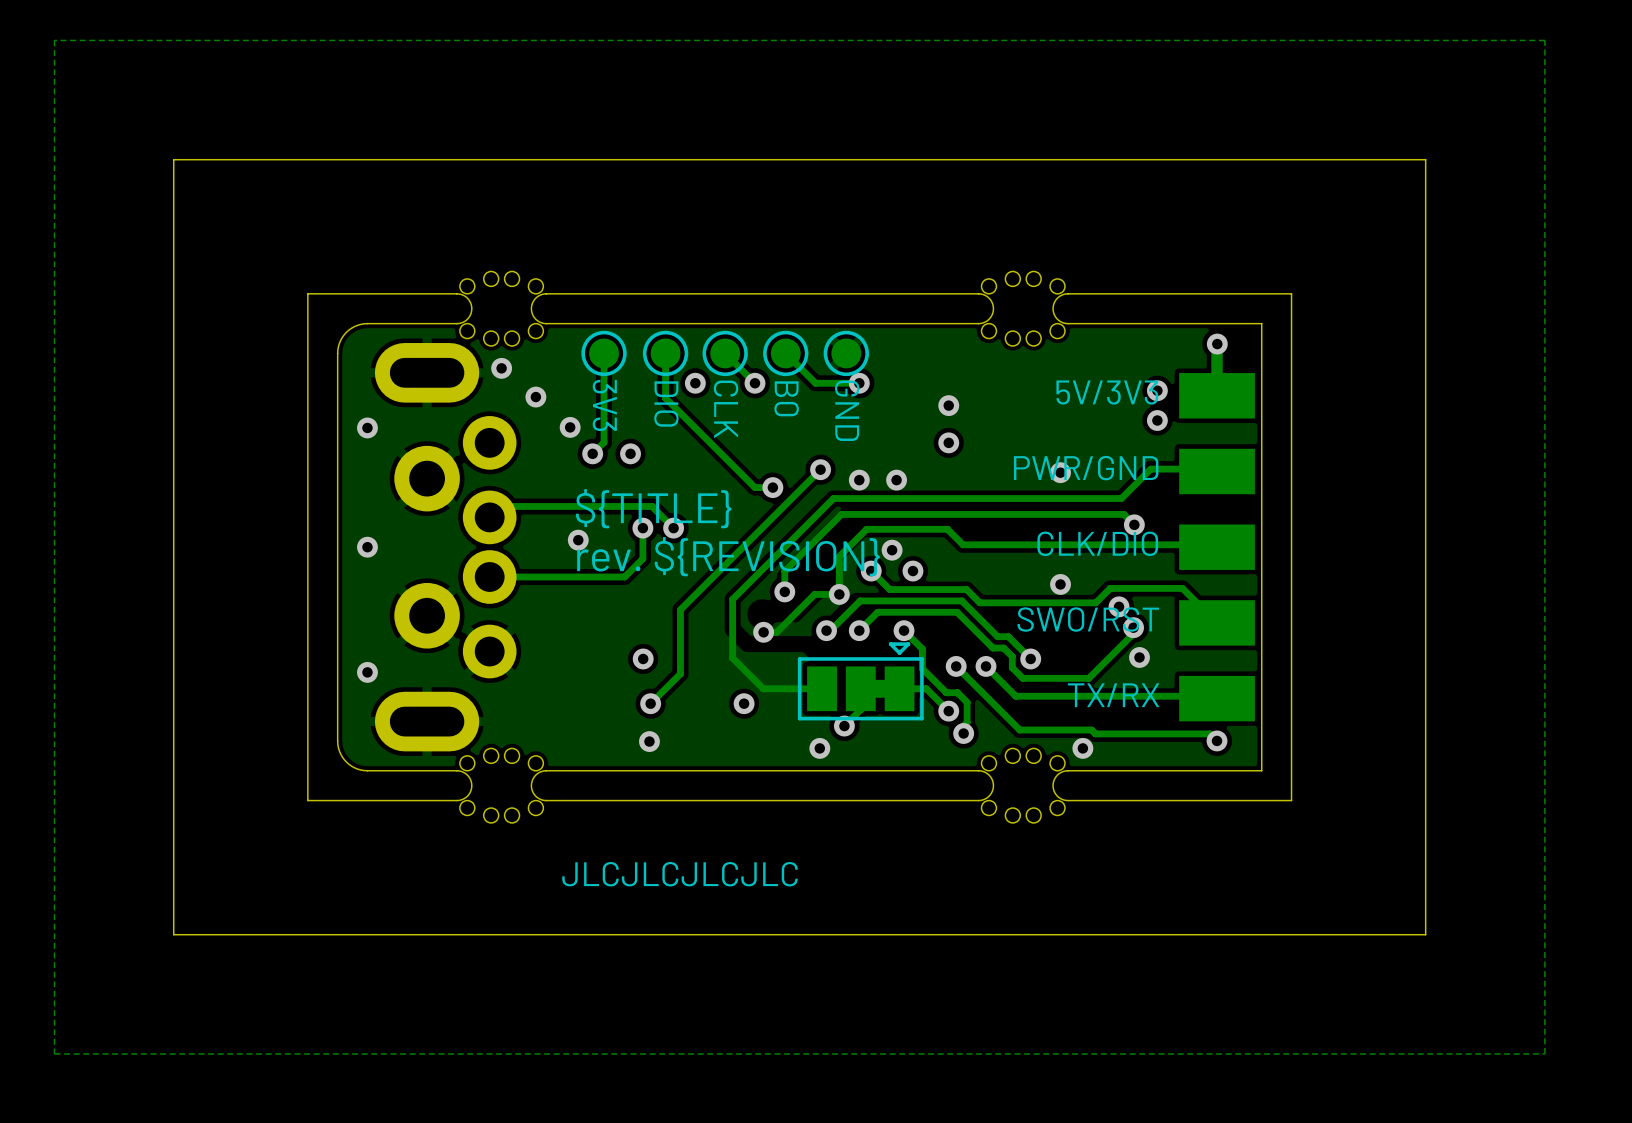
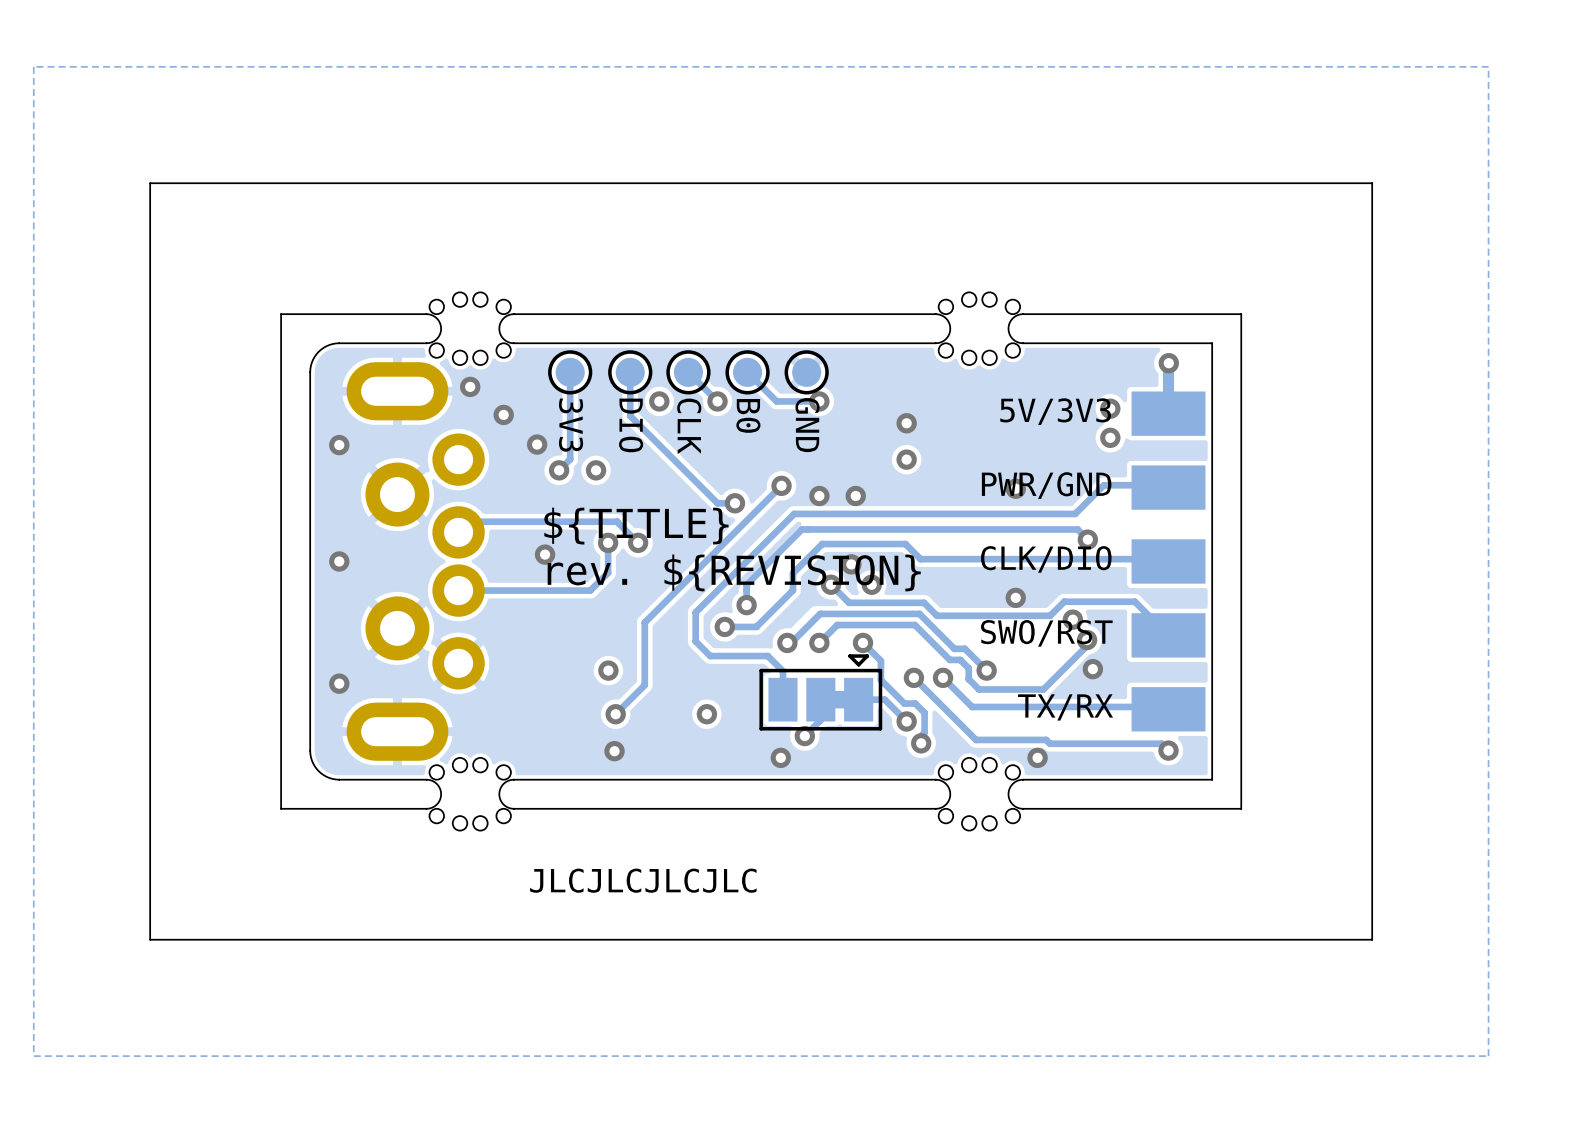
track: (866, 529) (839, 556) (839, 594) (814, 594) -> (826, 544) (822, 544) (792, 573) (792, 590) (775, 607)
via: (839, 594) -> none
track: (794, 614) (776, 632) (763, 632) -> (756, 626) (724, 626)
track: (732, 629) (732, 658) (763, 688) (822, 688) -> (695, 641) (710, 656) (767, 656) (782, 671) (782, 699)
via position: (763, 632) -> (724, 626)

